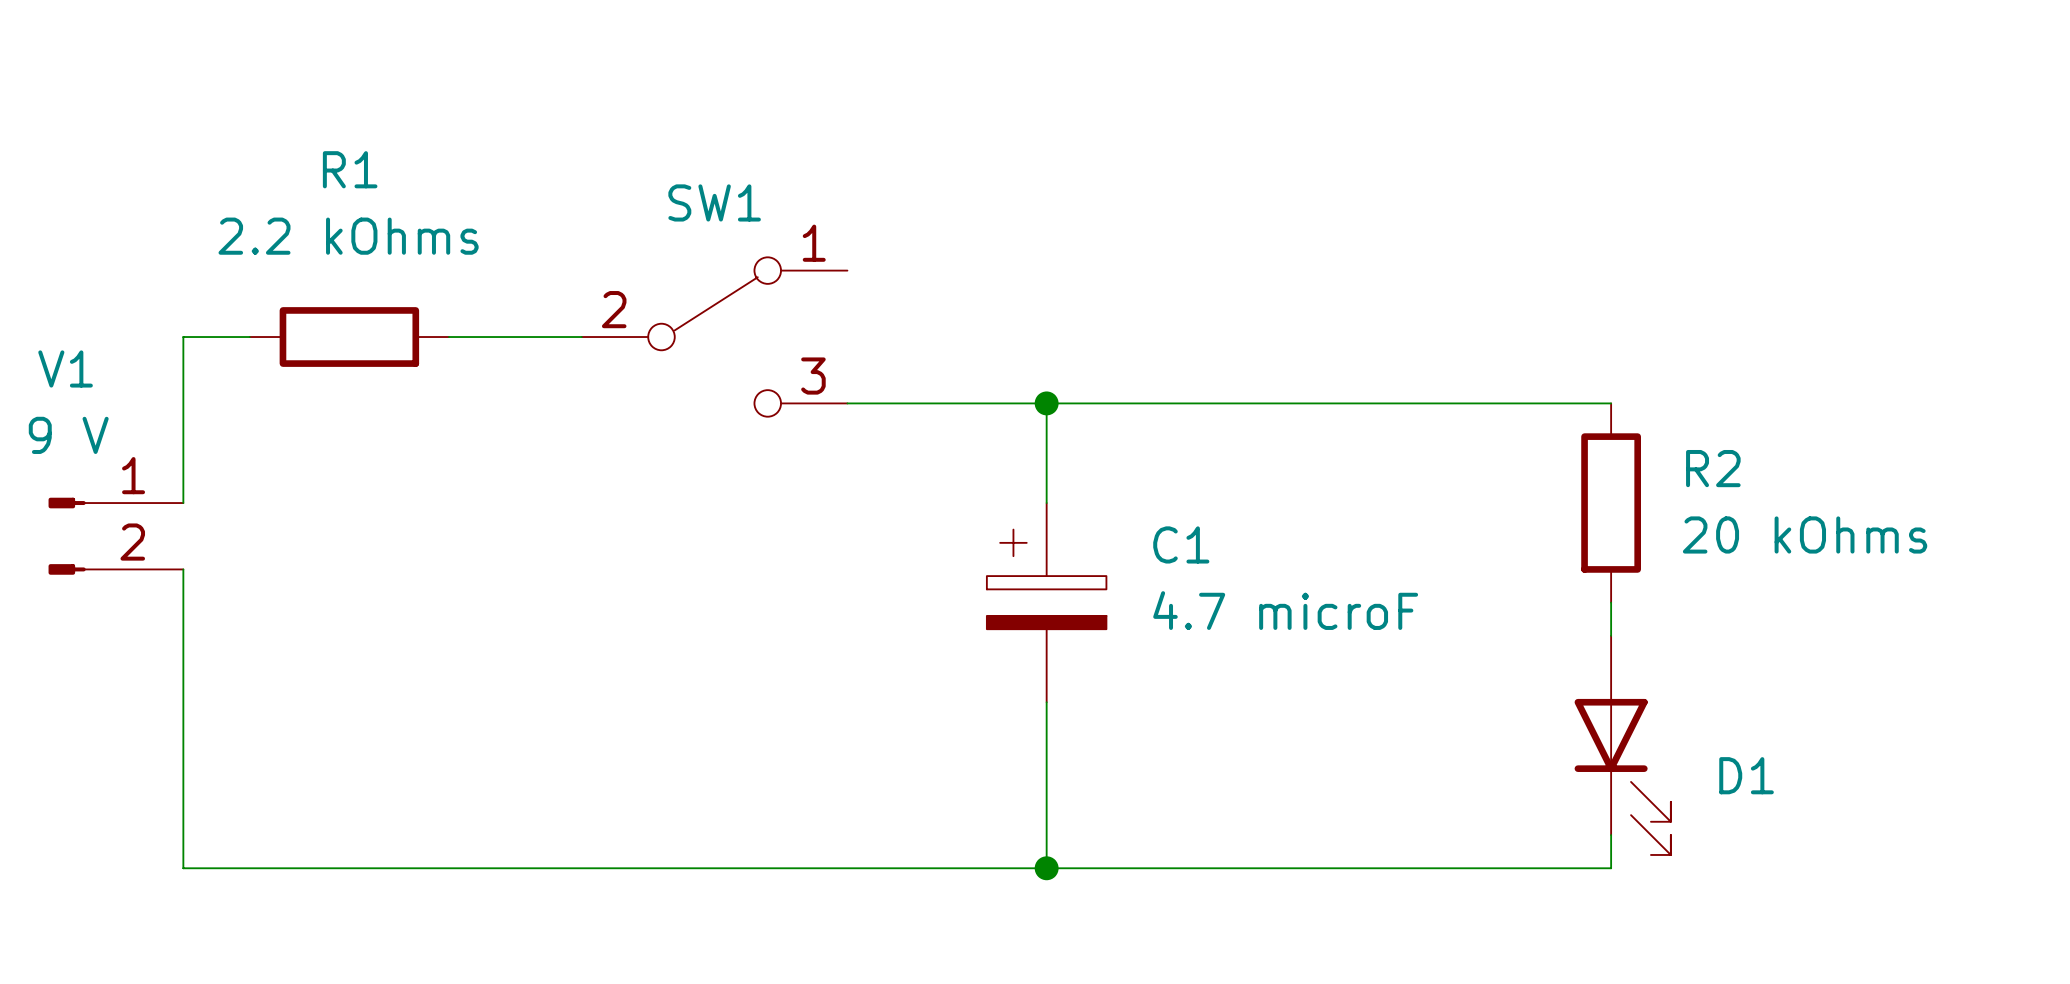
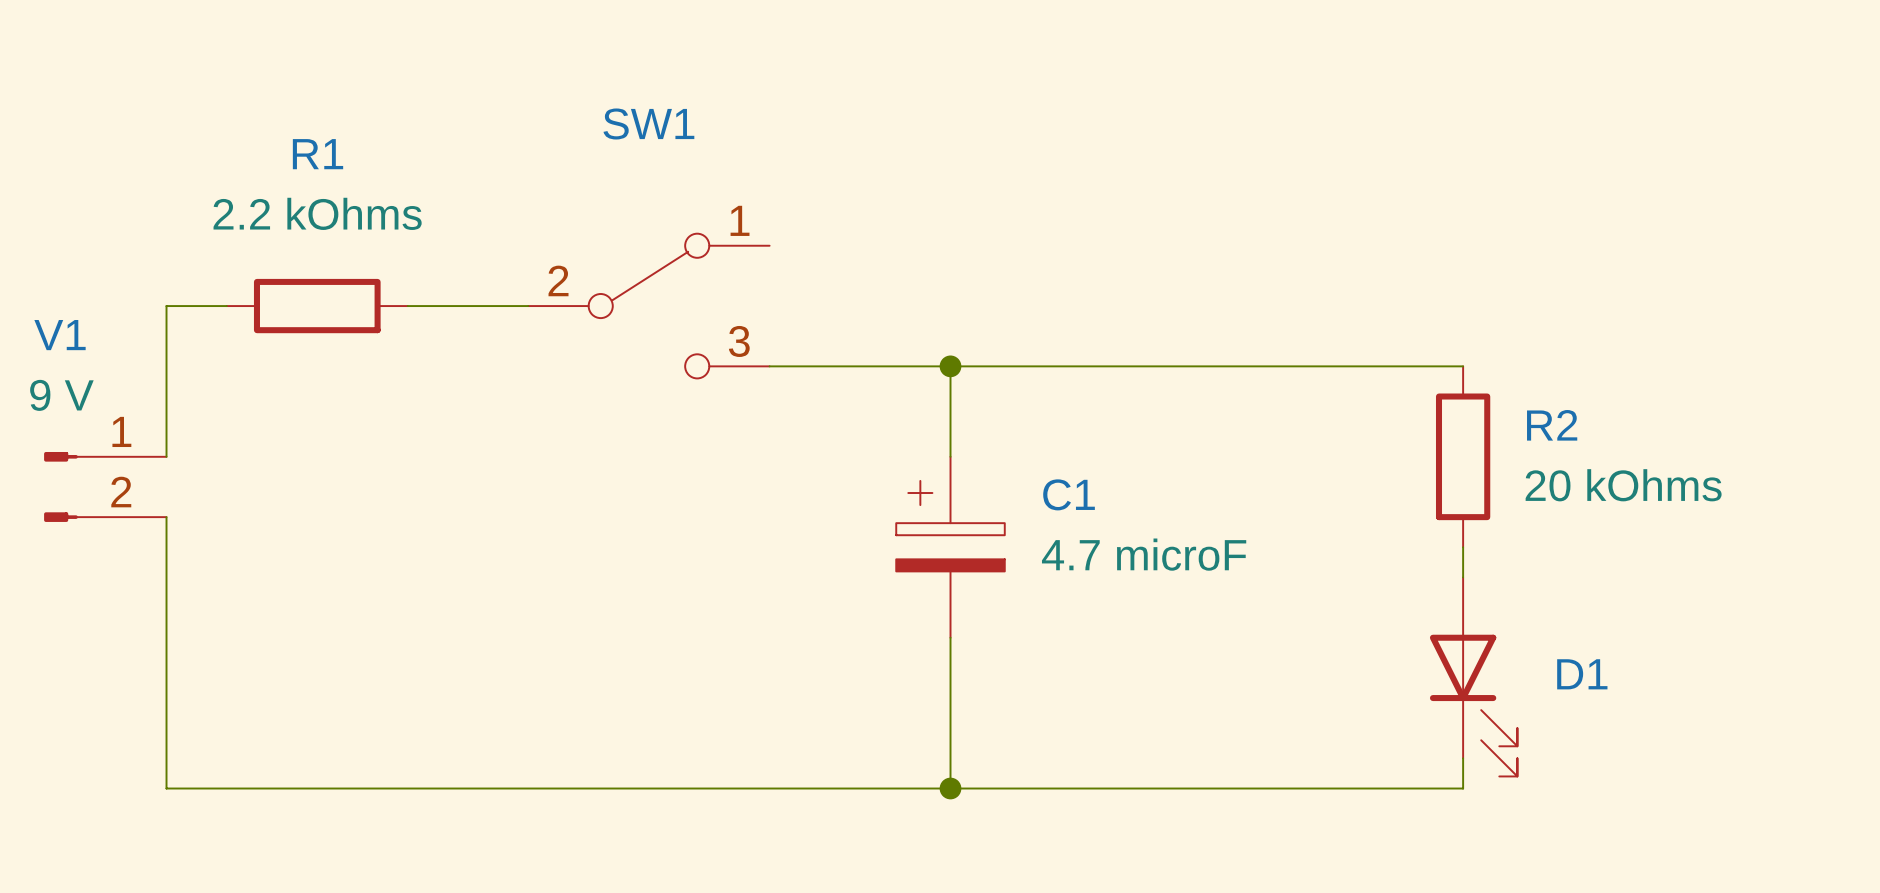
SW1 name position: SW1 (714, 202) -> SW1 (648, 123)
D1 name position: D1 (1746, 775) -> D1 (1582, 674)

